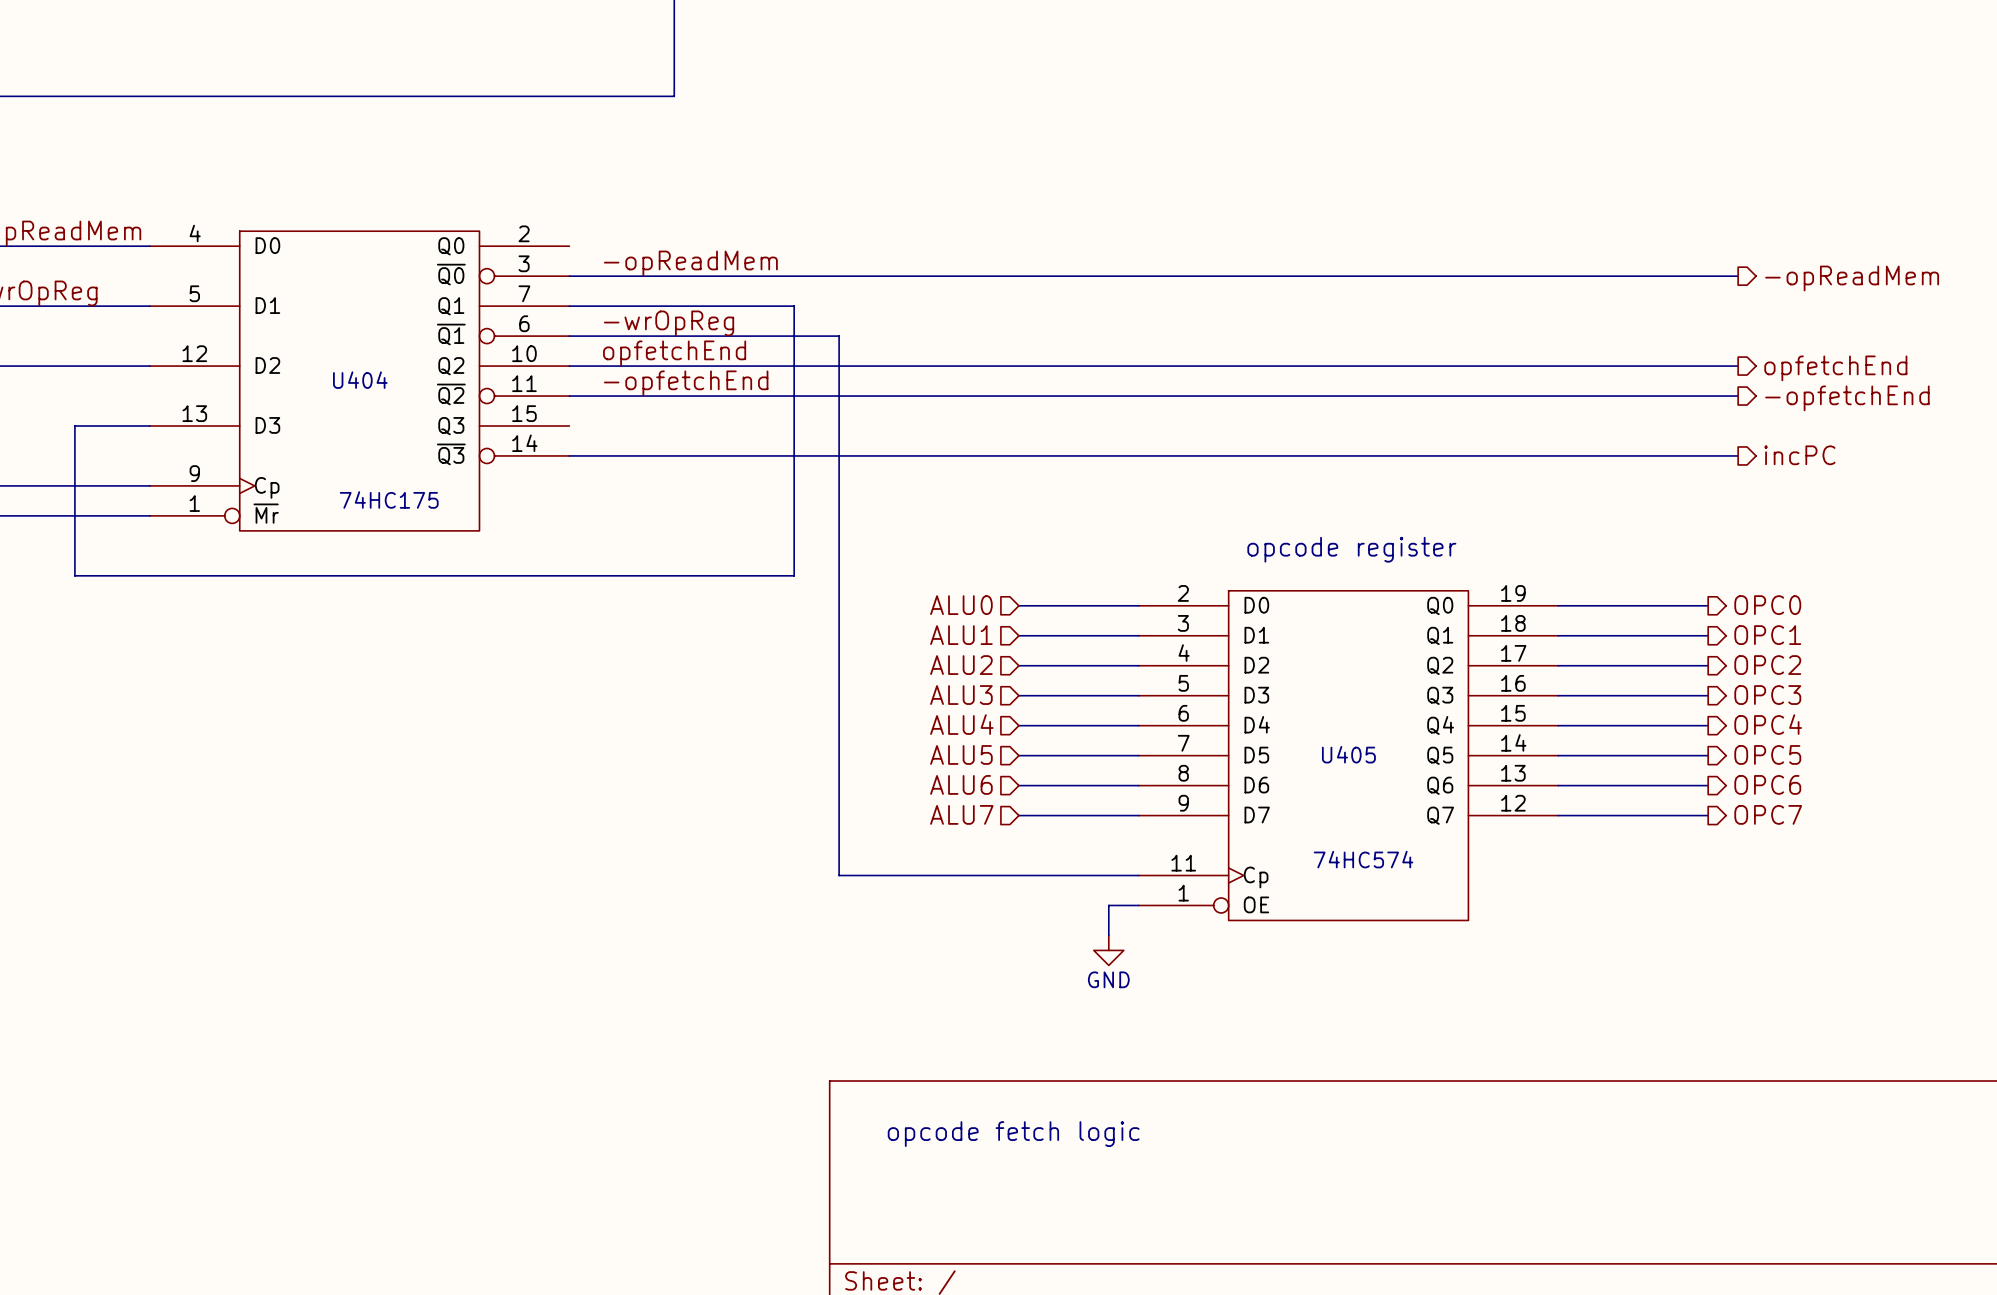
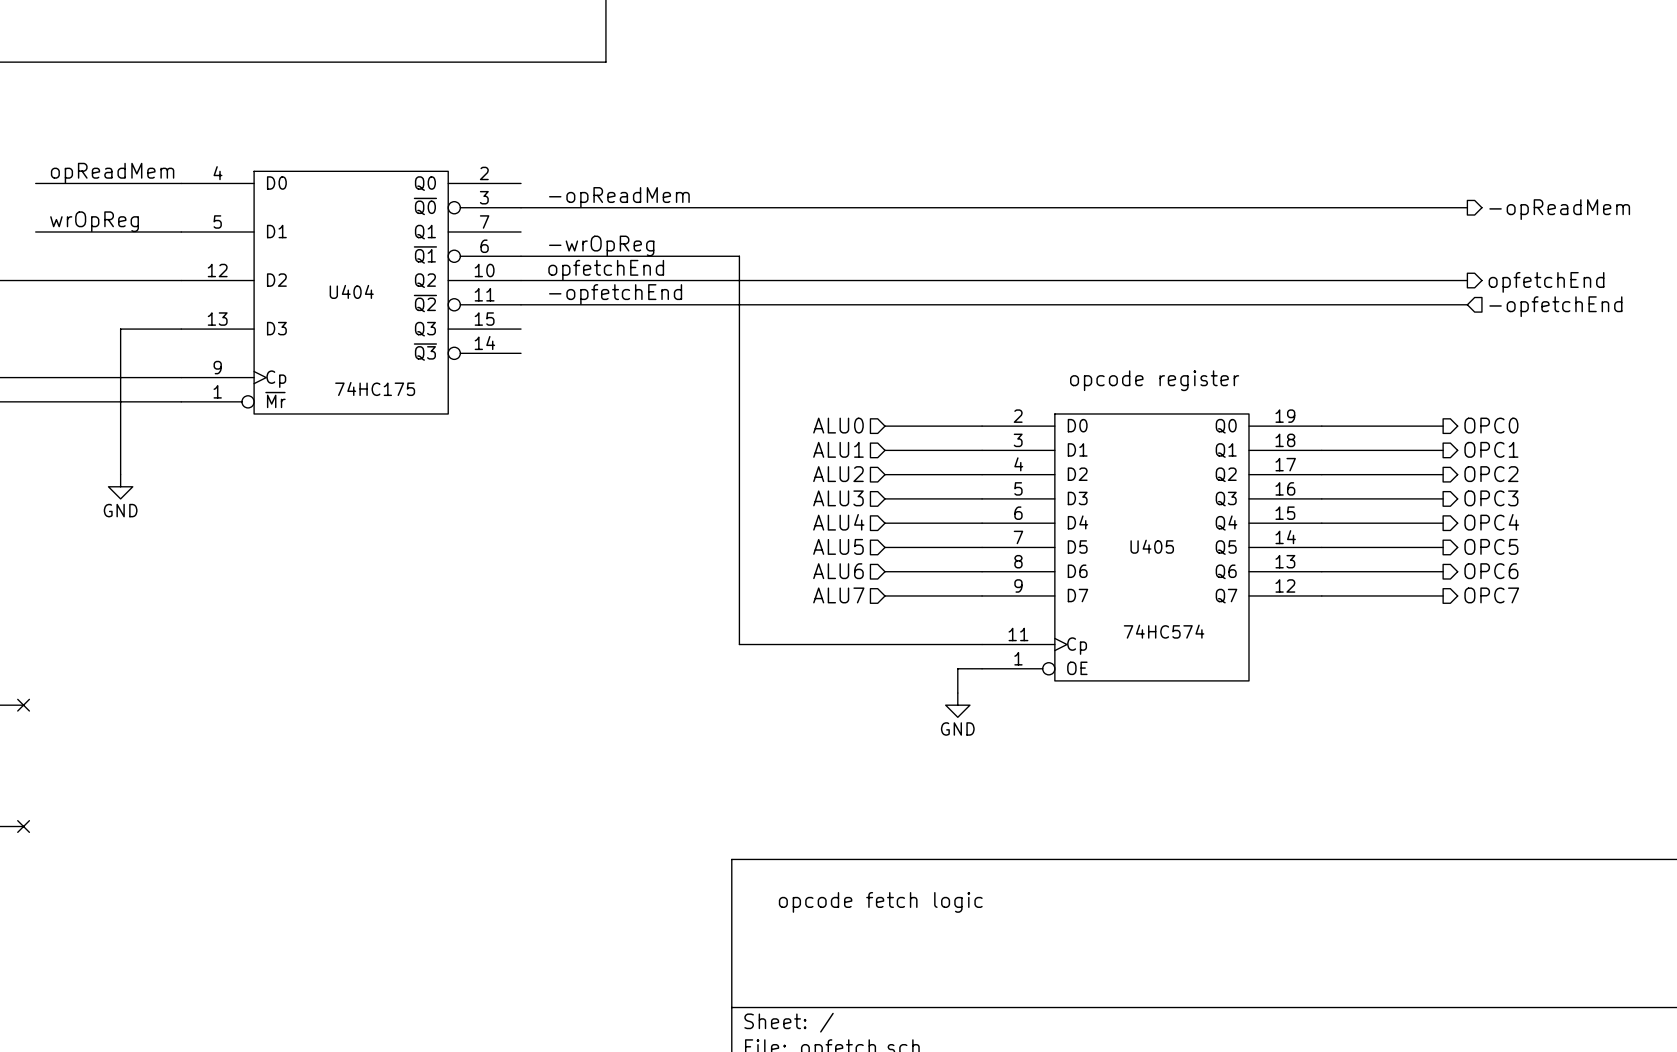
wire: (569, 306) (794, 306) (794, 575) (74, 575) -> (120, 474) (120, 450)
hierarchical label shape: output (1847, 398) -> input (1555, 306)
wire: (569, 455) (1738, 455) -> none
hierarchical label: incPC (1799, 455) -> none
hierarchical label: none -> ALU0 (838, 425)
hierarchical label: none -> OPC0 (1491, 425)
text position: opcode register (1351, 549) -> opcode register (1154, 380)
hierarchical label: none -> ALU1 (838, 449)
wire: none -> (885, 450) (982, 450)
hierarchical label: none -> OPC1 (1491, 449)
hierarchical label: ALU0 (961, 605) -> ALU2 (838, 474)
hierarchical label: OPC0 (1767, 605) -> OPC2 (1491, 474)
power symbol: none -> GND (120, 486)
hierarchical label: ALU1 (961, 635) -> ALU3 (838, 498)
hierarchical label: OPC1 (1767, 635) -> OPC3 (1491, 498)
hierarchical label: ALU2 (961, 665) -> ALU4 (838, 522)
hierarchical label: OPC2 (1767, 665) -> OPC4 (1491, 522)
hierarchical label: ALU3 (961, 695) -> ALU5 (838, 546)
hierarchical label: OPC3 (1767, 695) -> OPC5 (1491, 546)
hierarchical label: ALU4 (961, 724) -> ALU6 (838, 571)
hierarchical label: OPC4 (1768, 724) -> OPC6 (1491, 571)
hierarchical label: ALU5 (961, 754) -> ALU7 (838, 595)
hierarchical label: OPC5 (1767, 754) -> OPC7 (1491, 595)
U405 position: (1348, 755) -> (1151, 547)
hierarchical label: ALU6 (961, 784) -> none
hierarchical label: OPC6 (1767, 784) -> none
wire: (1018, 785) (1138, 785) -> (885, 426) (982, 426)
wire: (1558, 785) (1708, 785) -> (1321, 426) (1443, 426)
hierarchical label: ALU7 (961, 814) -> none
hierarchical label: OPC7 (1768, 814) -> none
wire: (839, 815) (839, 875) (1138, 875) -> (739, 644) (885, 644)
wire: (1558, 815) (1708, 815) -> (1321, 450) (1443, 450)
wire: (1138, 905) (1108, 905) (1108, 935) -> (982, 668) (957, 668) (957, 693)
power symbol position: GND (1108, 950) -> GND (957, 705)

